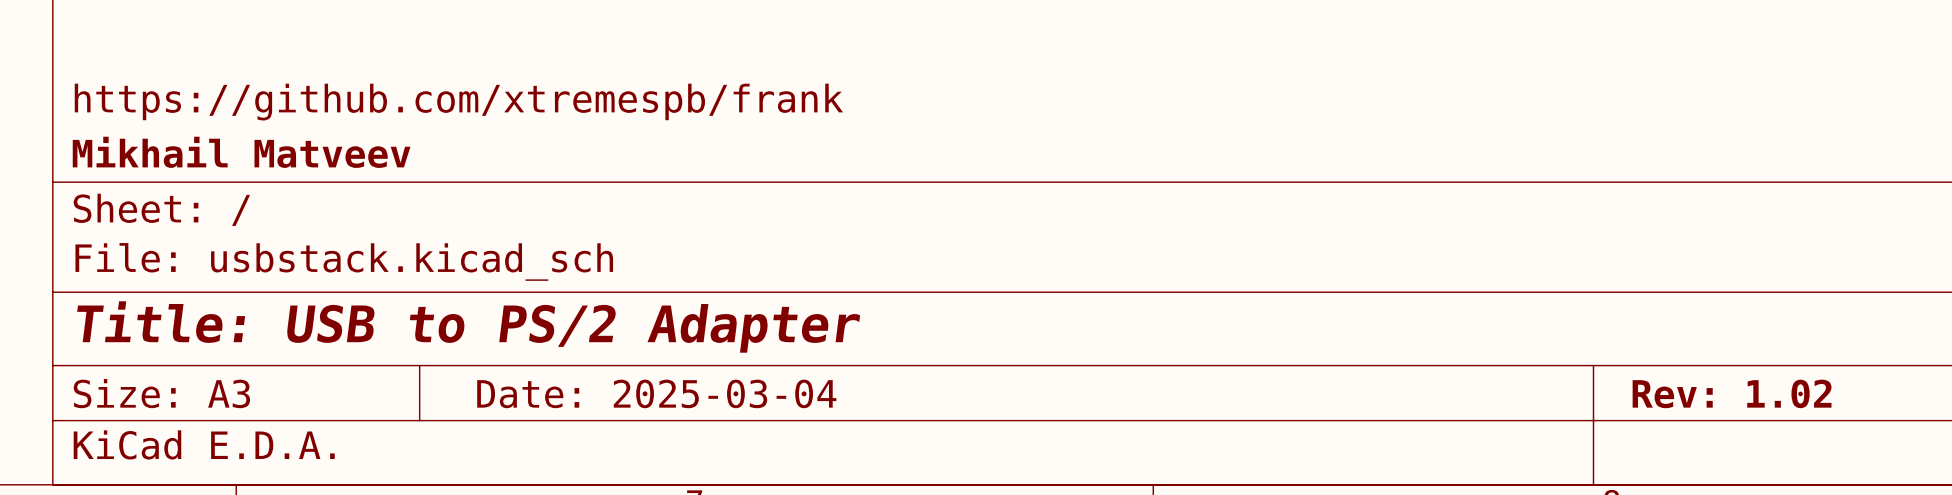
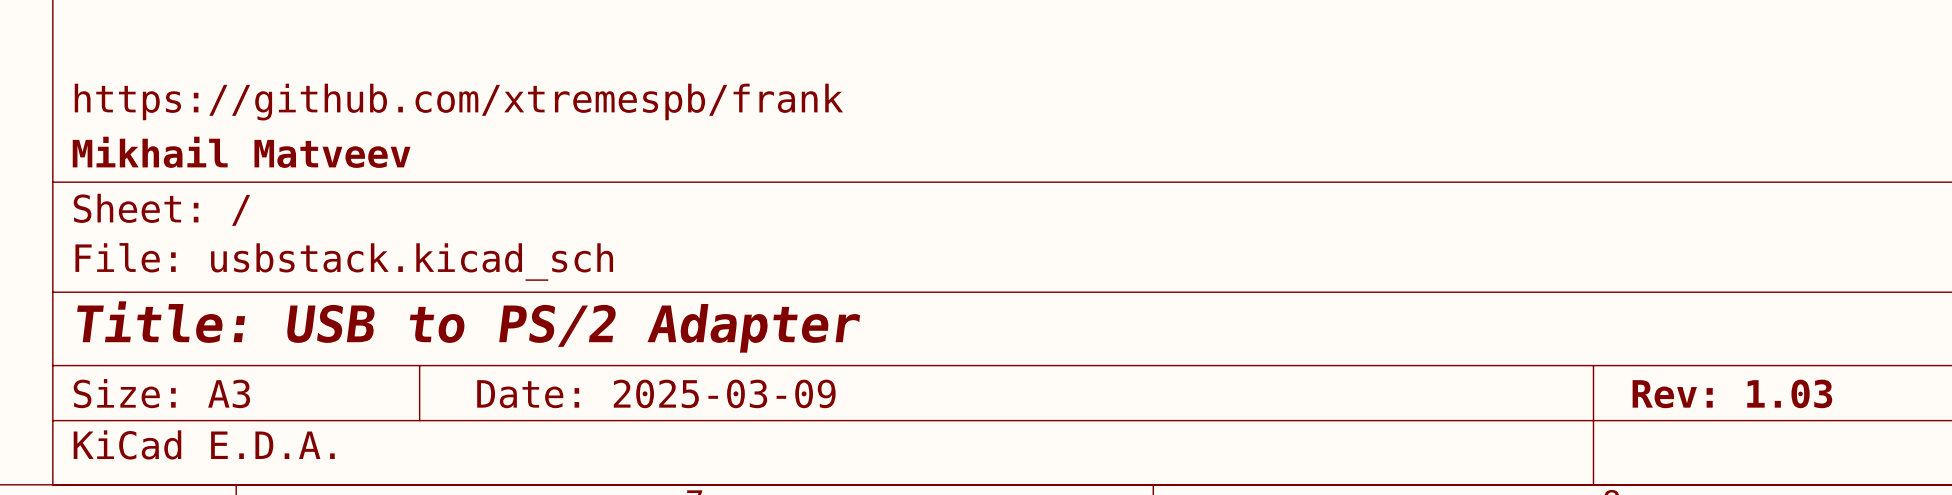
title block: Date: 2025-03-04 (656, 393) -> Date: 2025-03-09 (656, 393)
title block: Rev: 1.02 (1732, 393) -> Rev: 1.03 (1732, 393)

